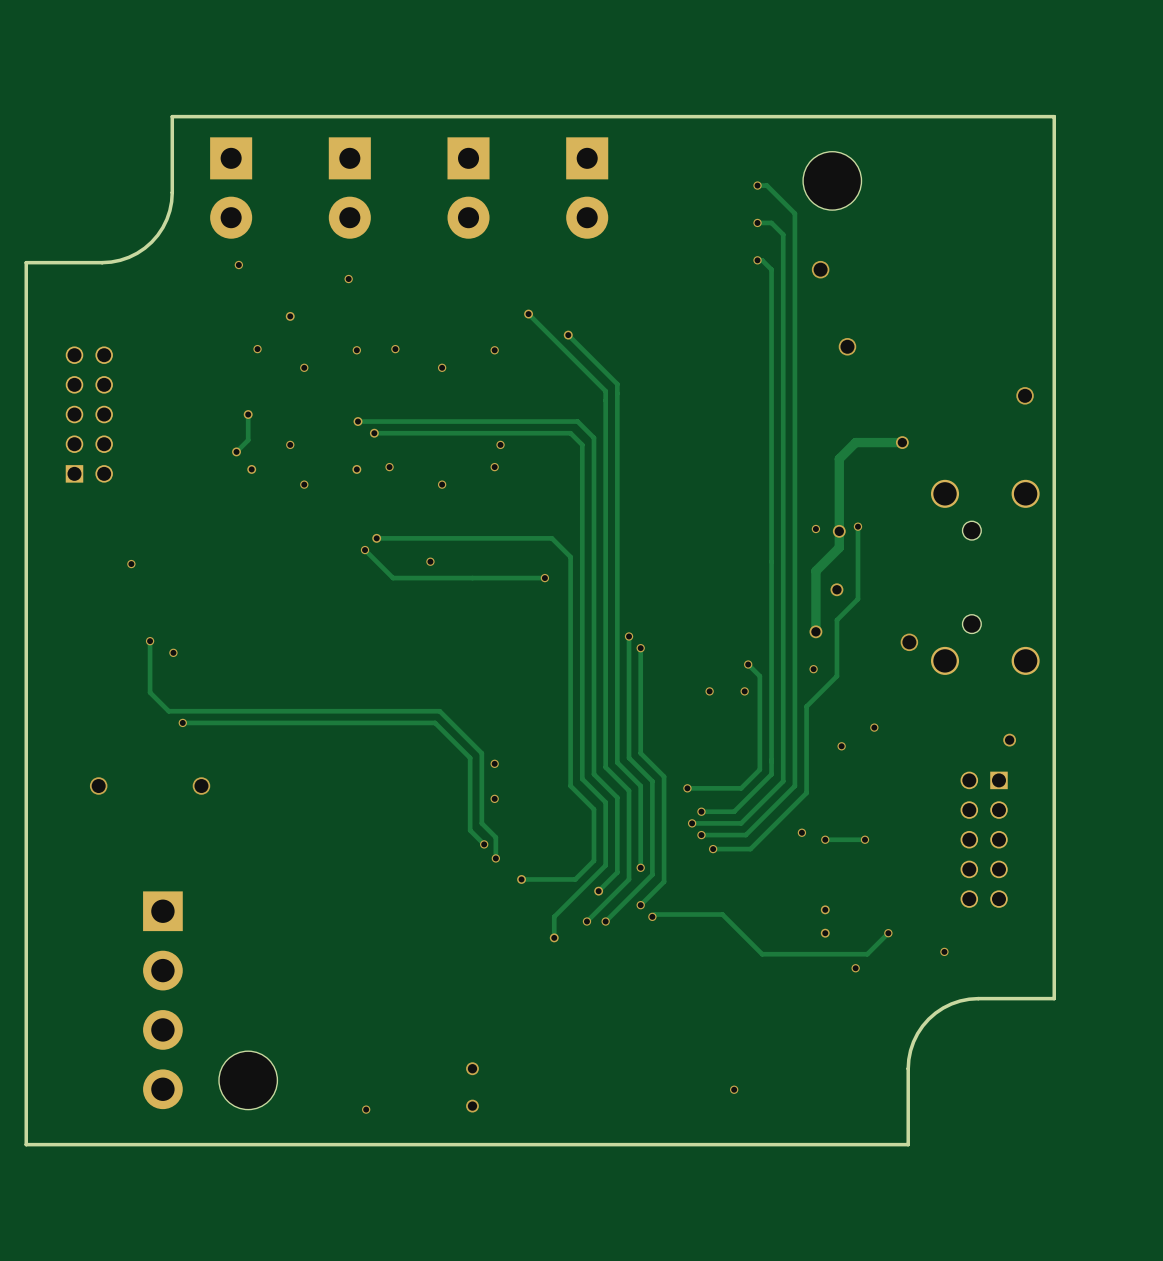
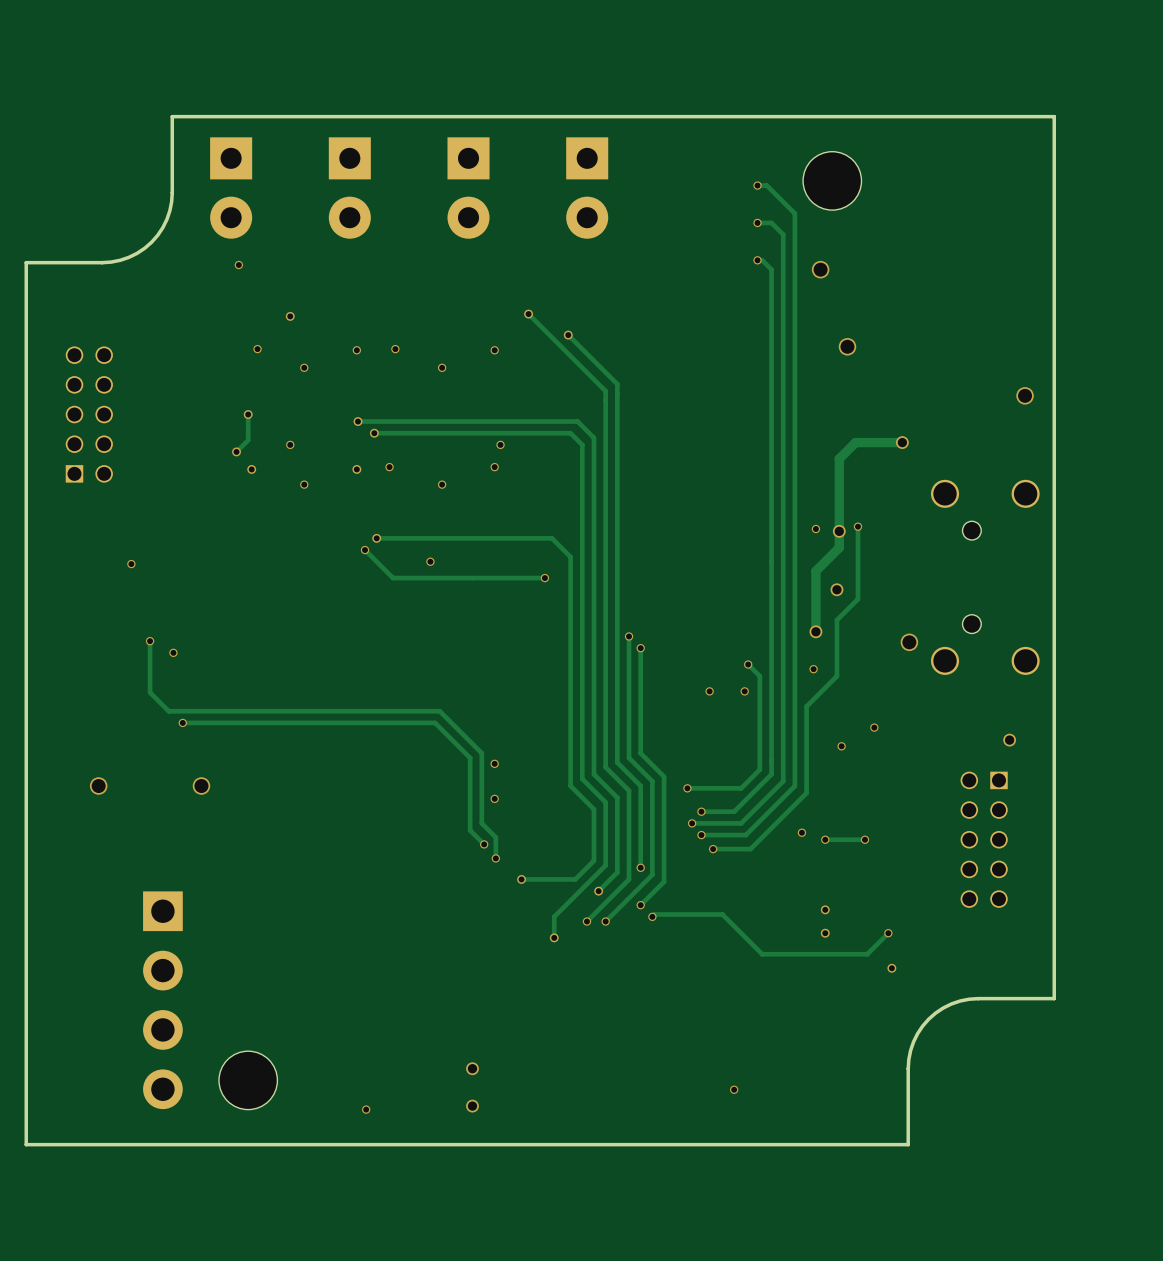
via: (348, 279) -> none
via: (944, 951) -> none
via: (855, 968) -> none
via: none -> (891, 968)

